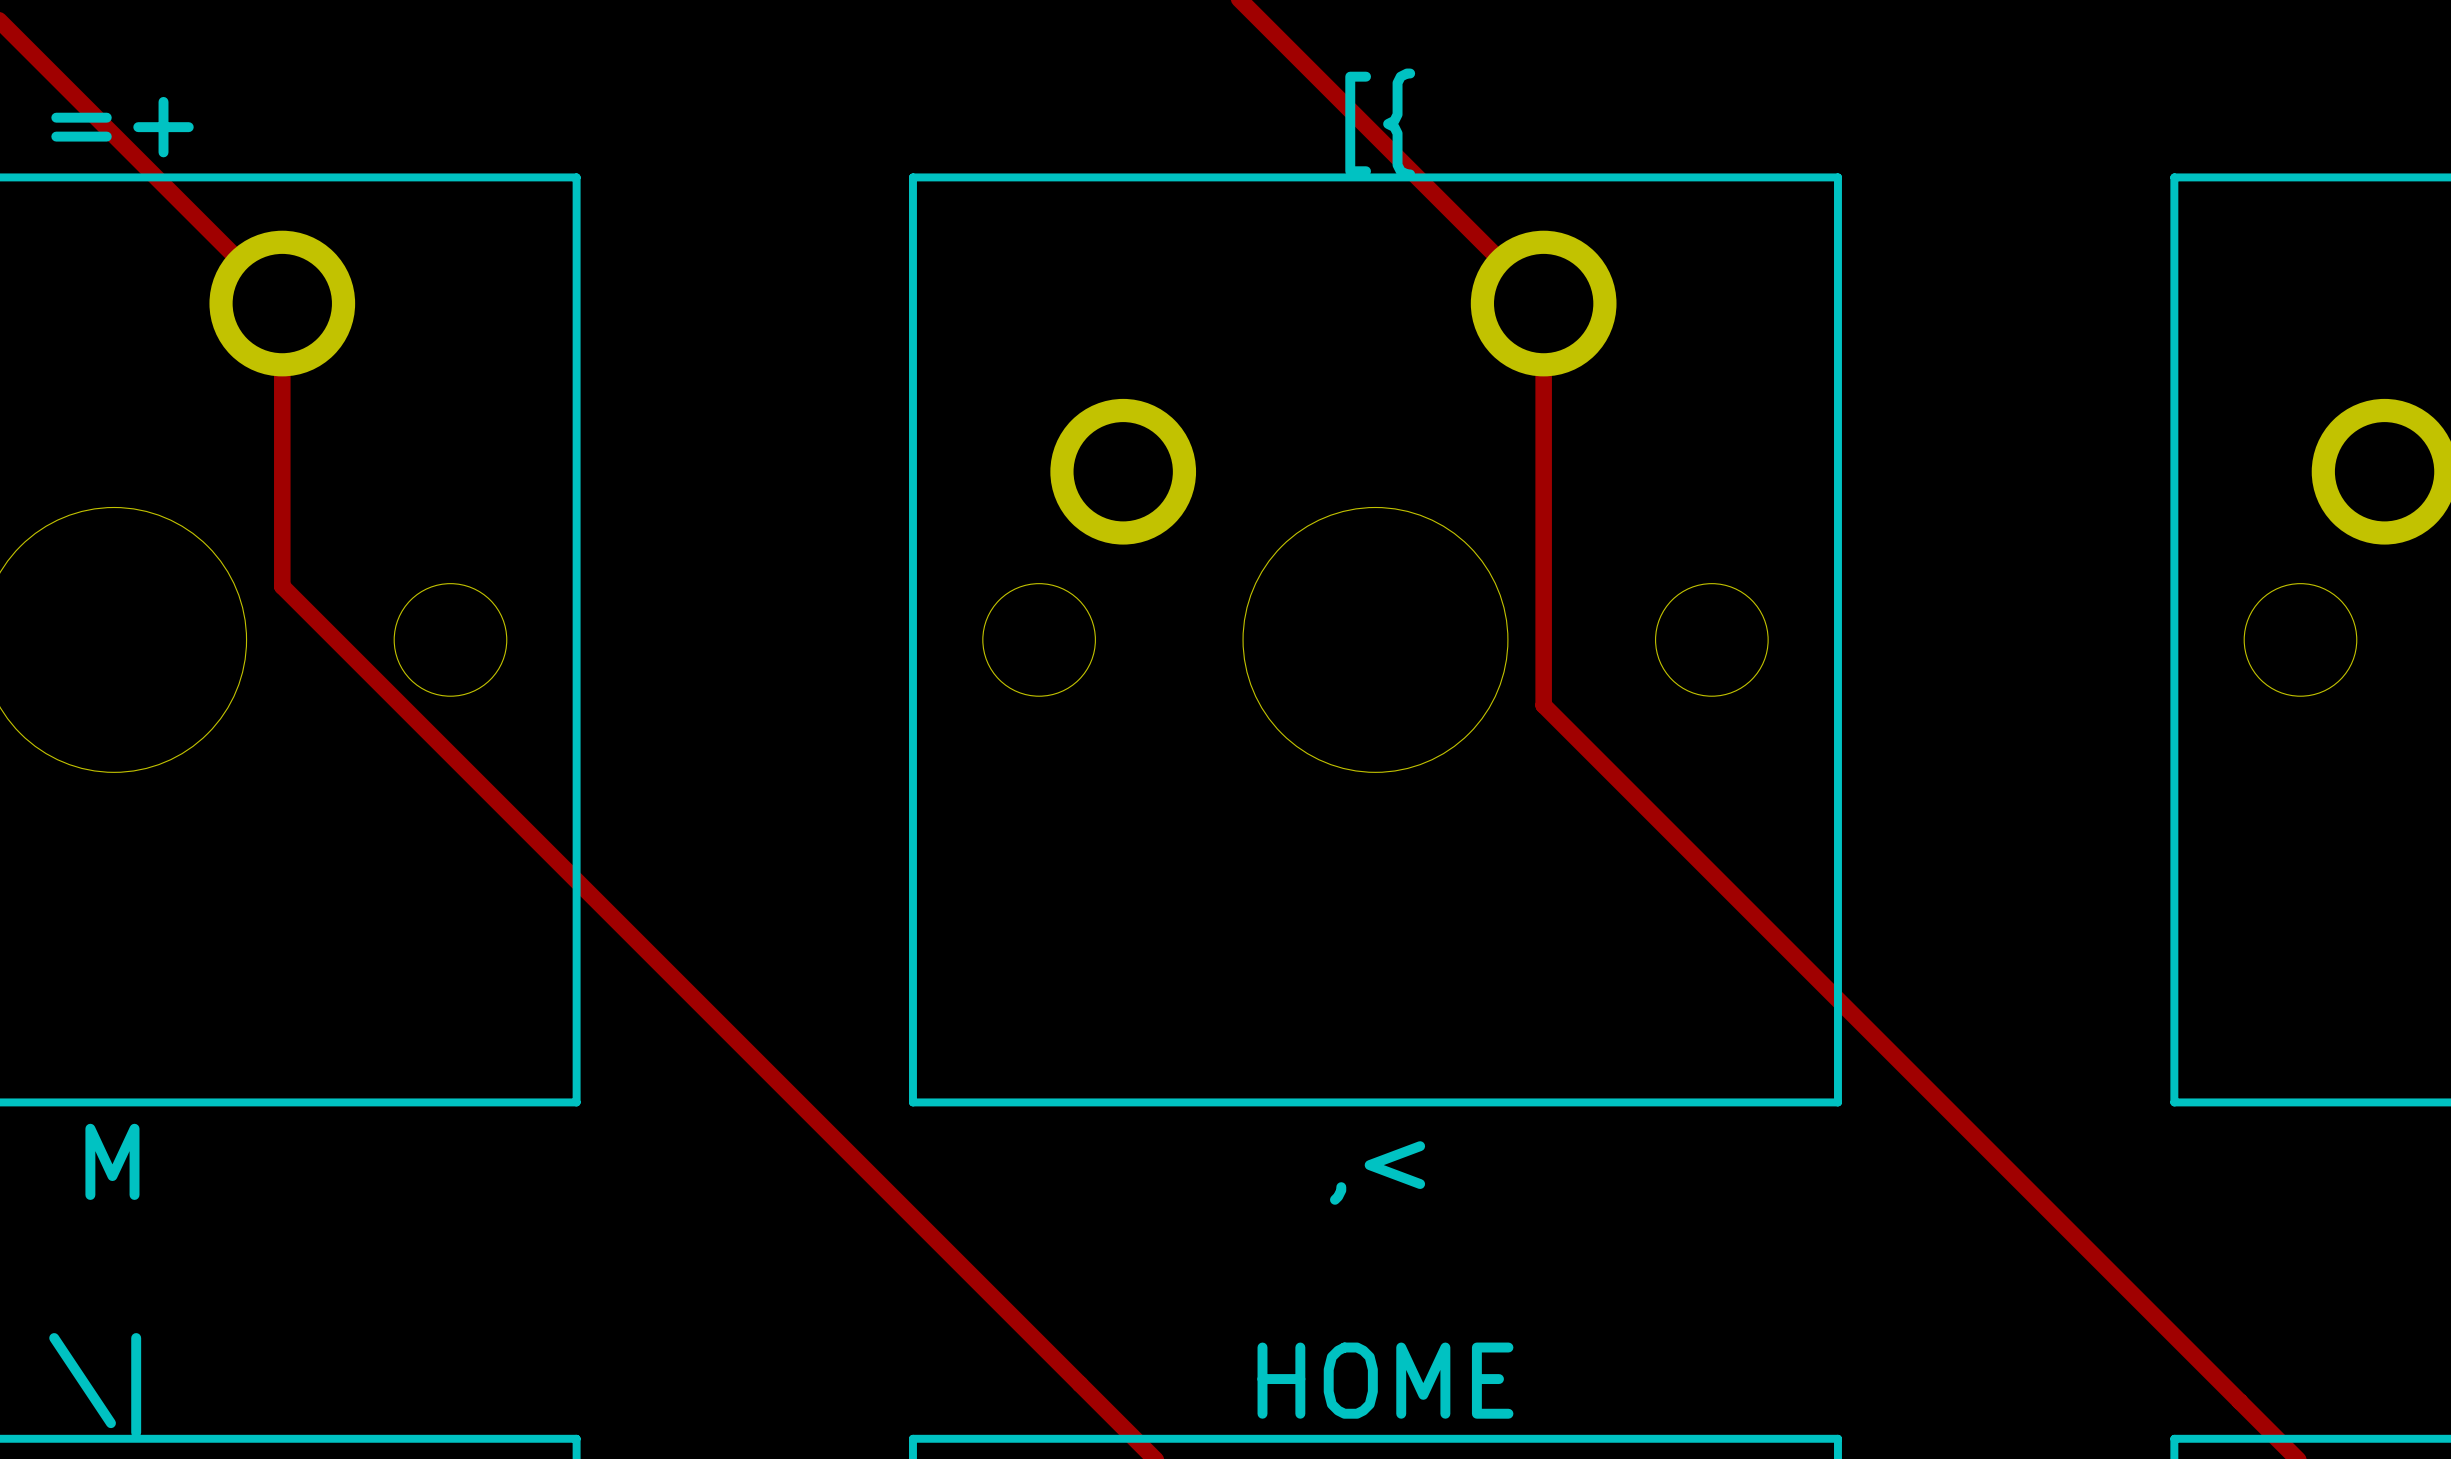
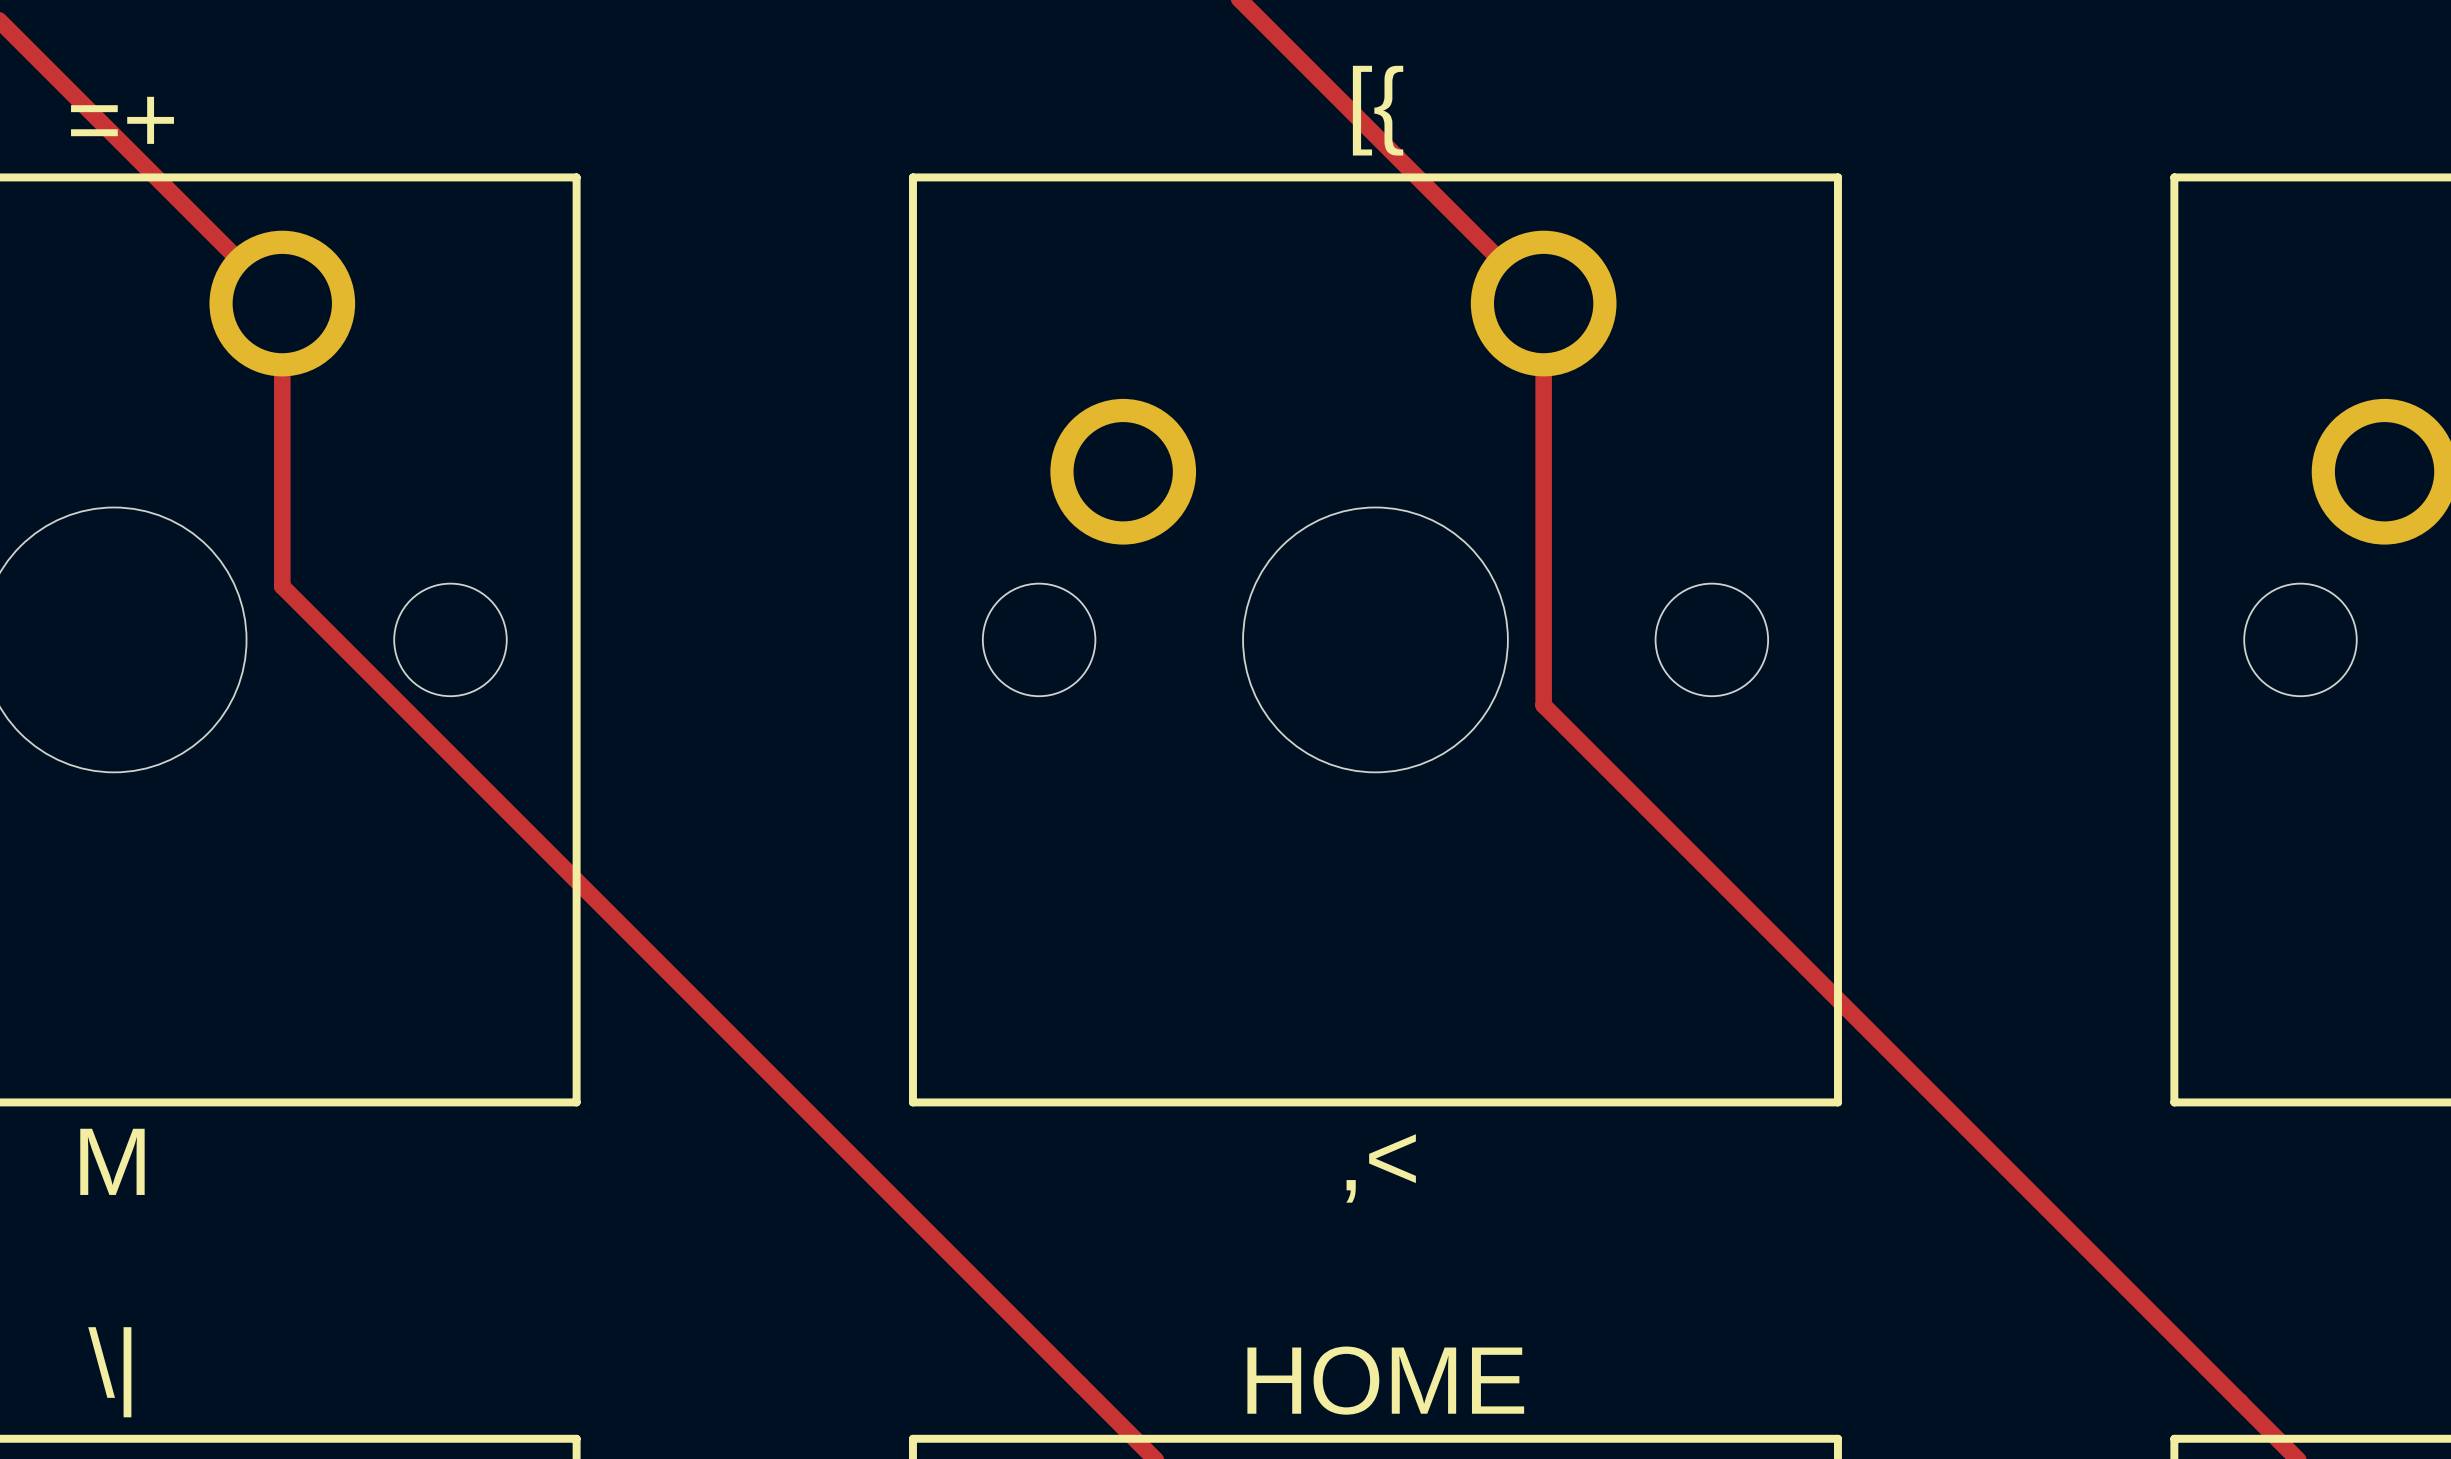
part name position: [{ (1380, 123) -> [{ (1378, 110)
part name position: \| (95, 1385) -> \| (109, 1372)

